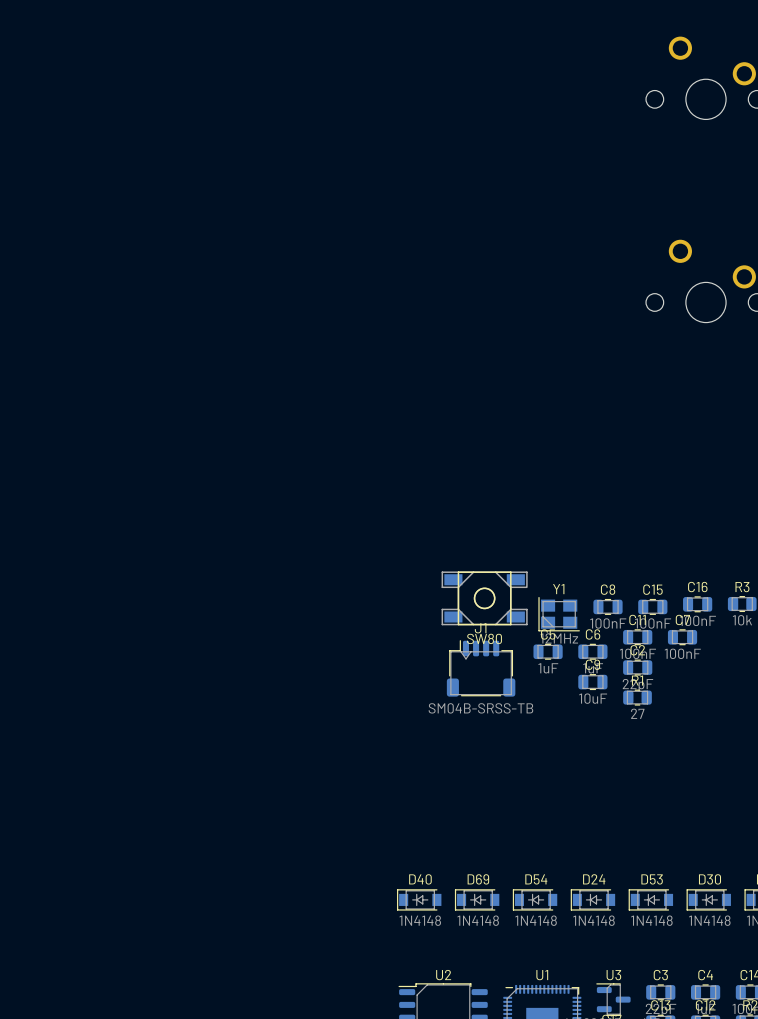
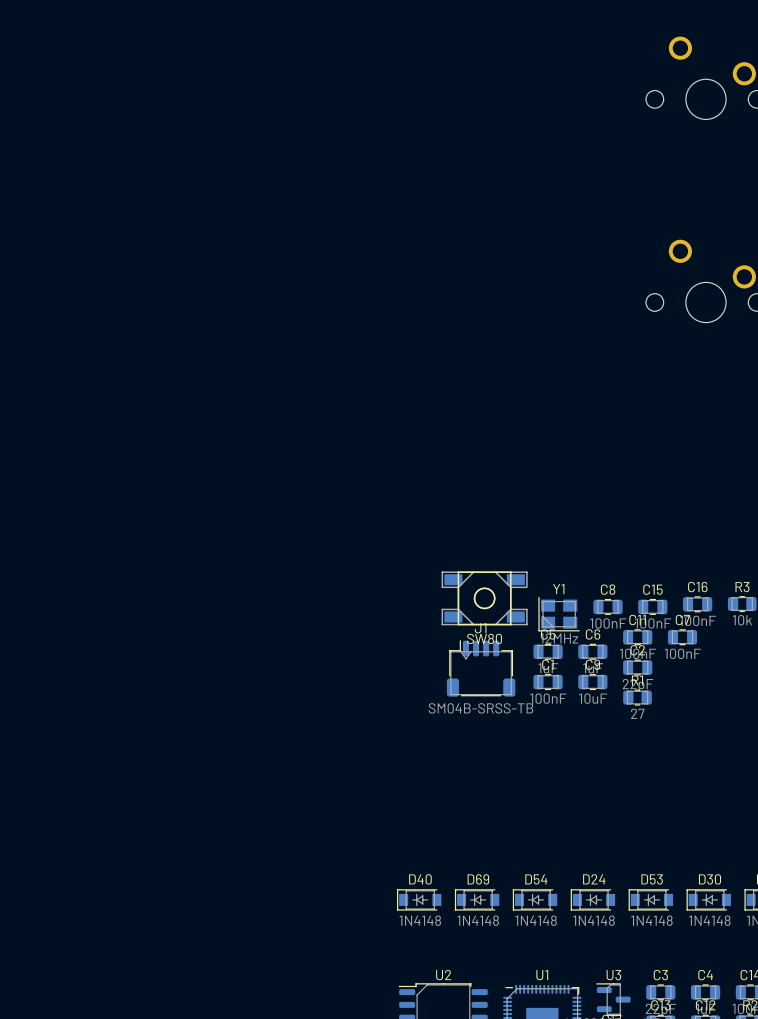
C1: none -> 100nF (548, 682)

